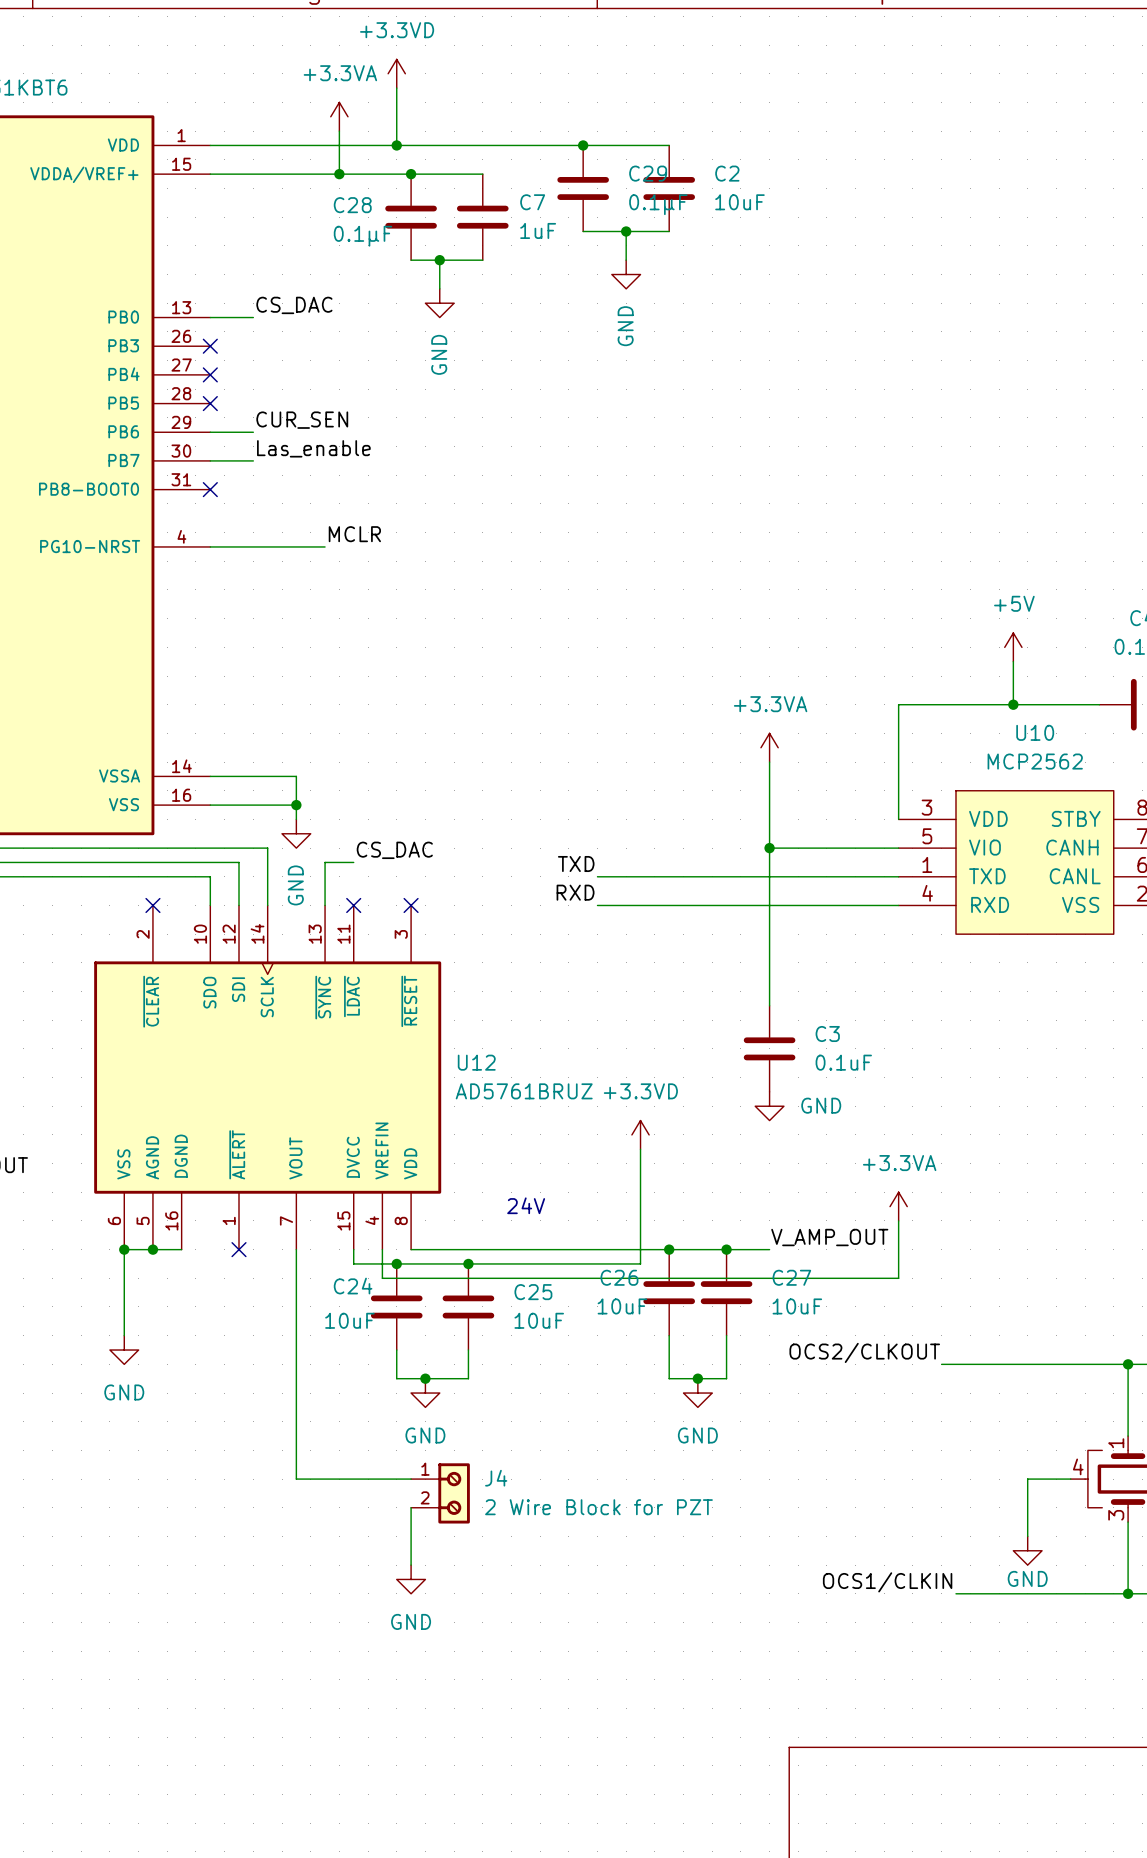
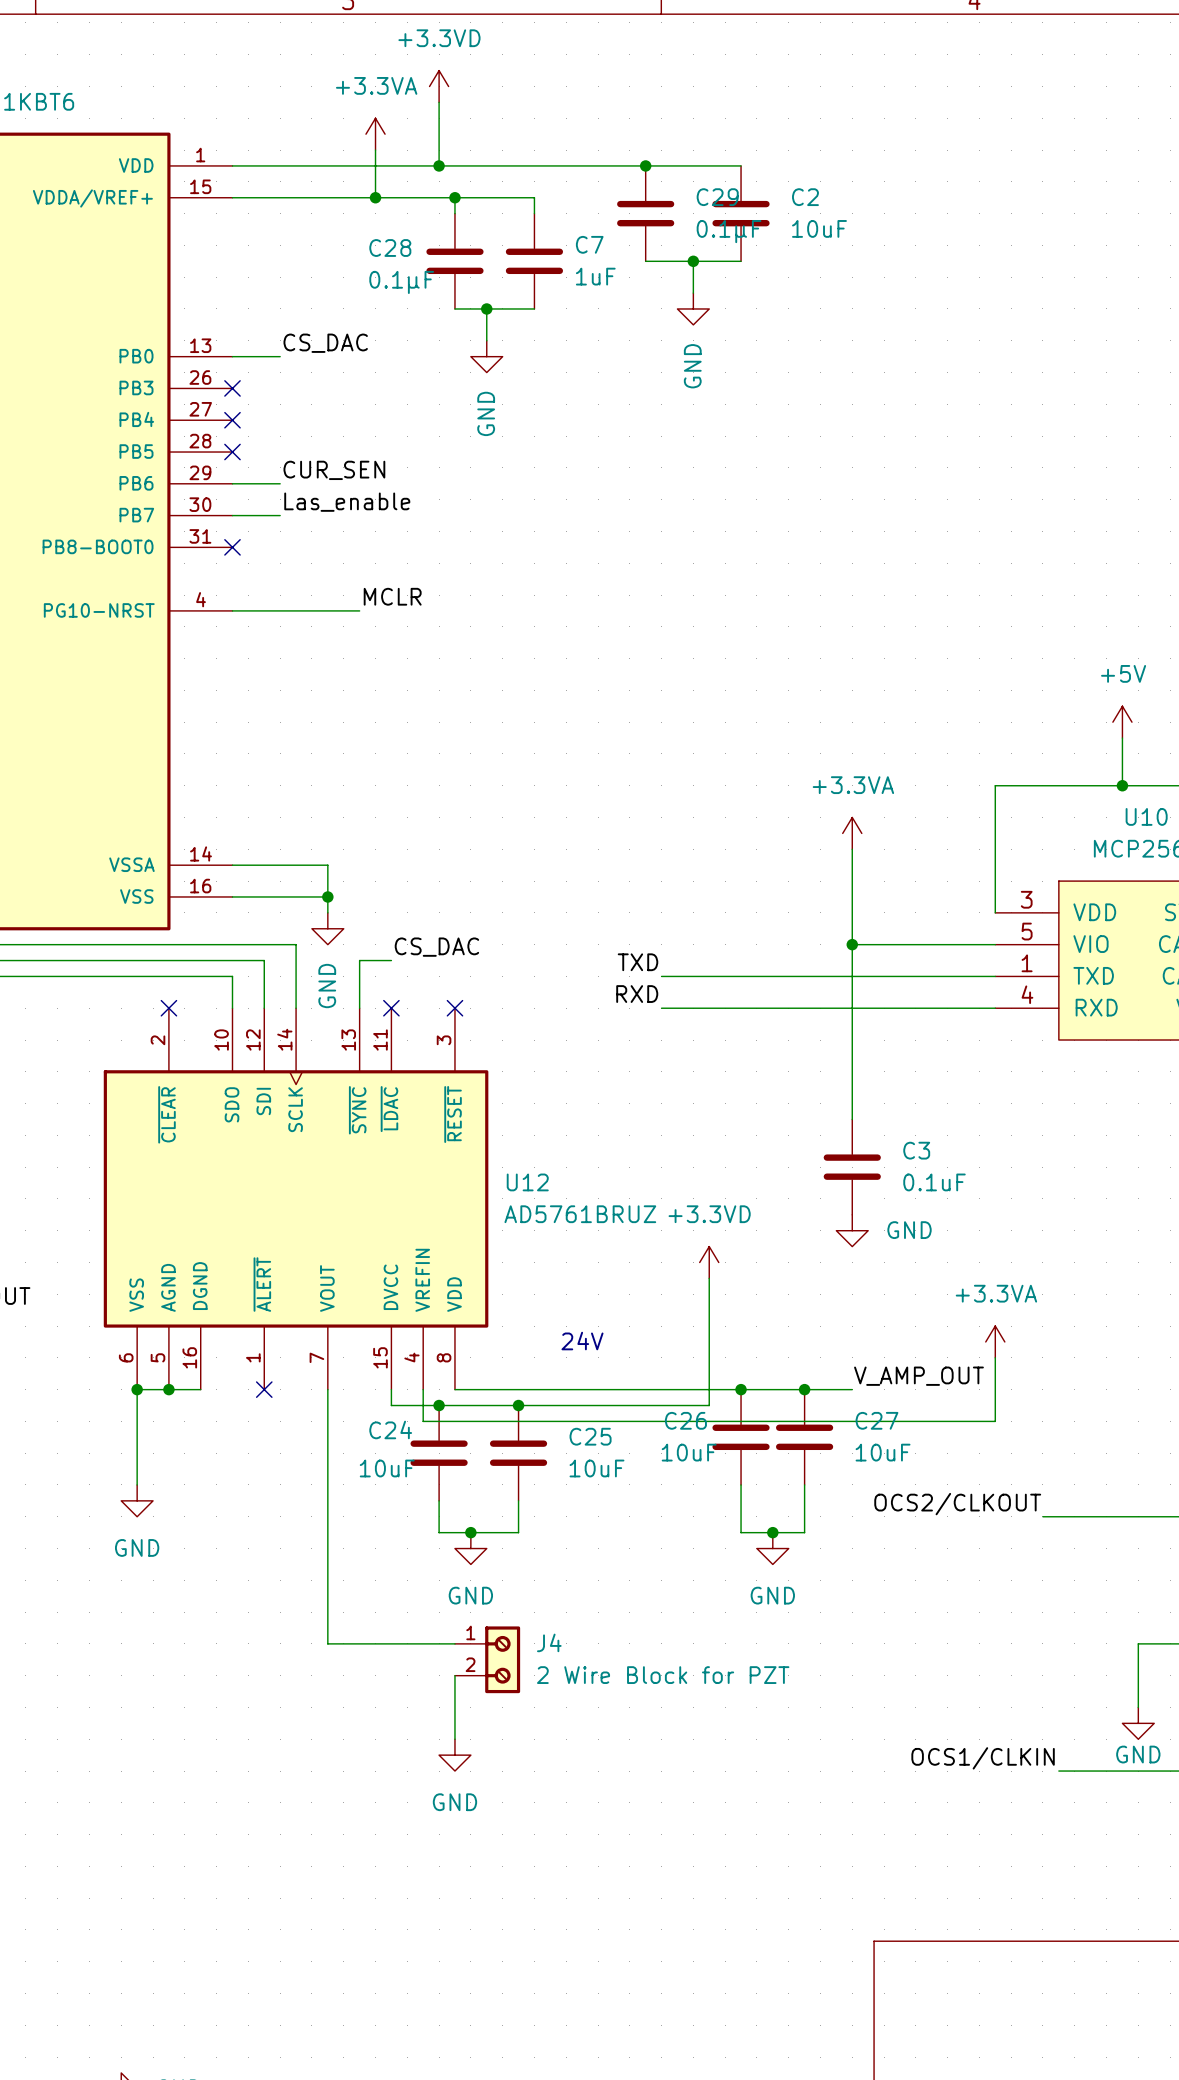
C28 position: (411, 217) -> (454, 261)
C7 position: (482, 217) -> (534, 261)
wire: (411, 260) (482, 260) -> (454, 308) (534, 308)
junction position: (439, 260) -> (486, 308)
power symbol position: GND (439, 303) -> GND (486, 356)

